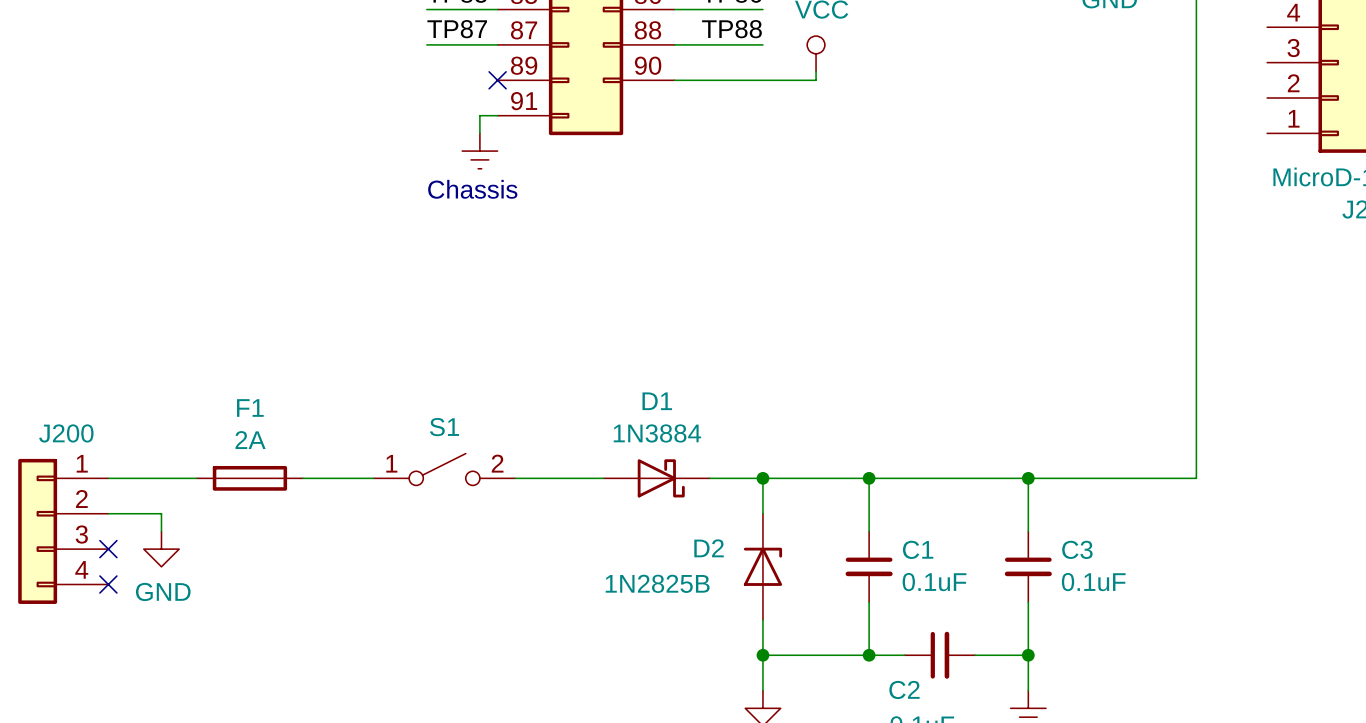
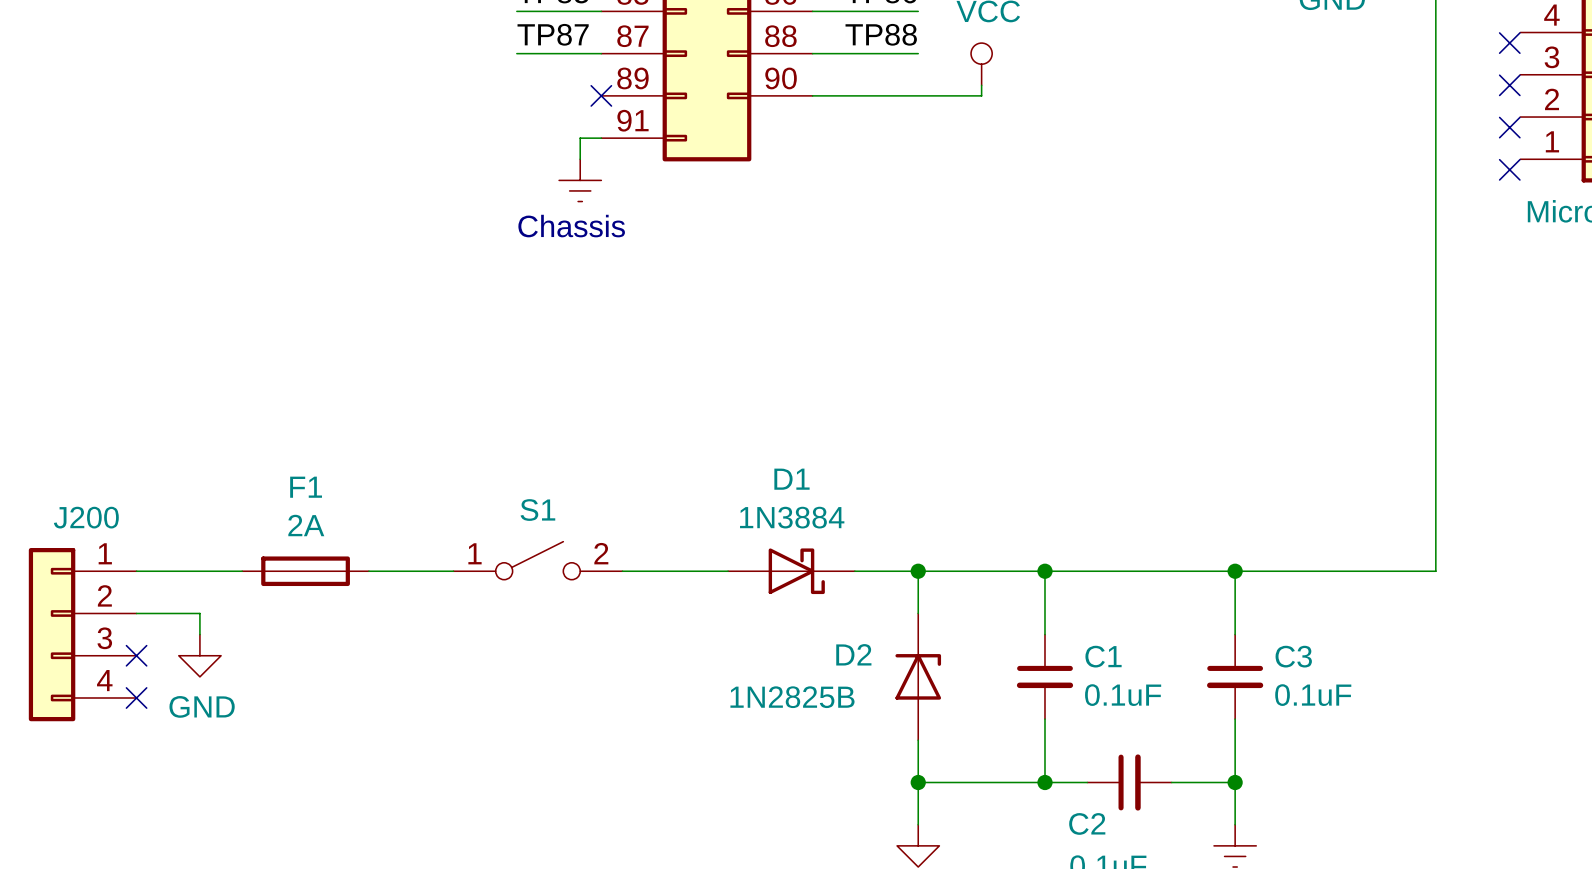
no-connect mark: none -> (1509, 43)
no-connect mark: none -> (1509, 85)
no-connect mark: none -> (1509, 127)
no-connect mark: none -> (1509, 169)

